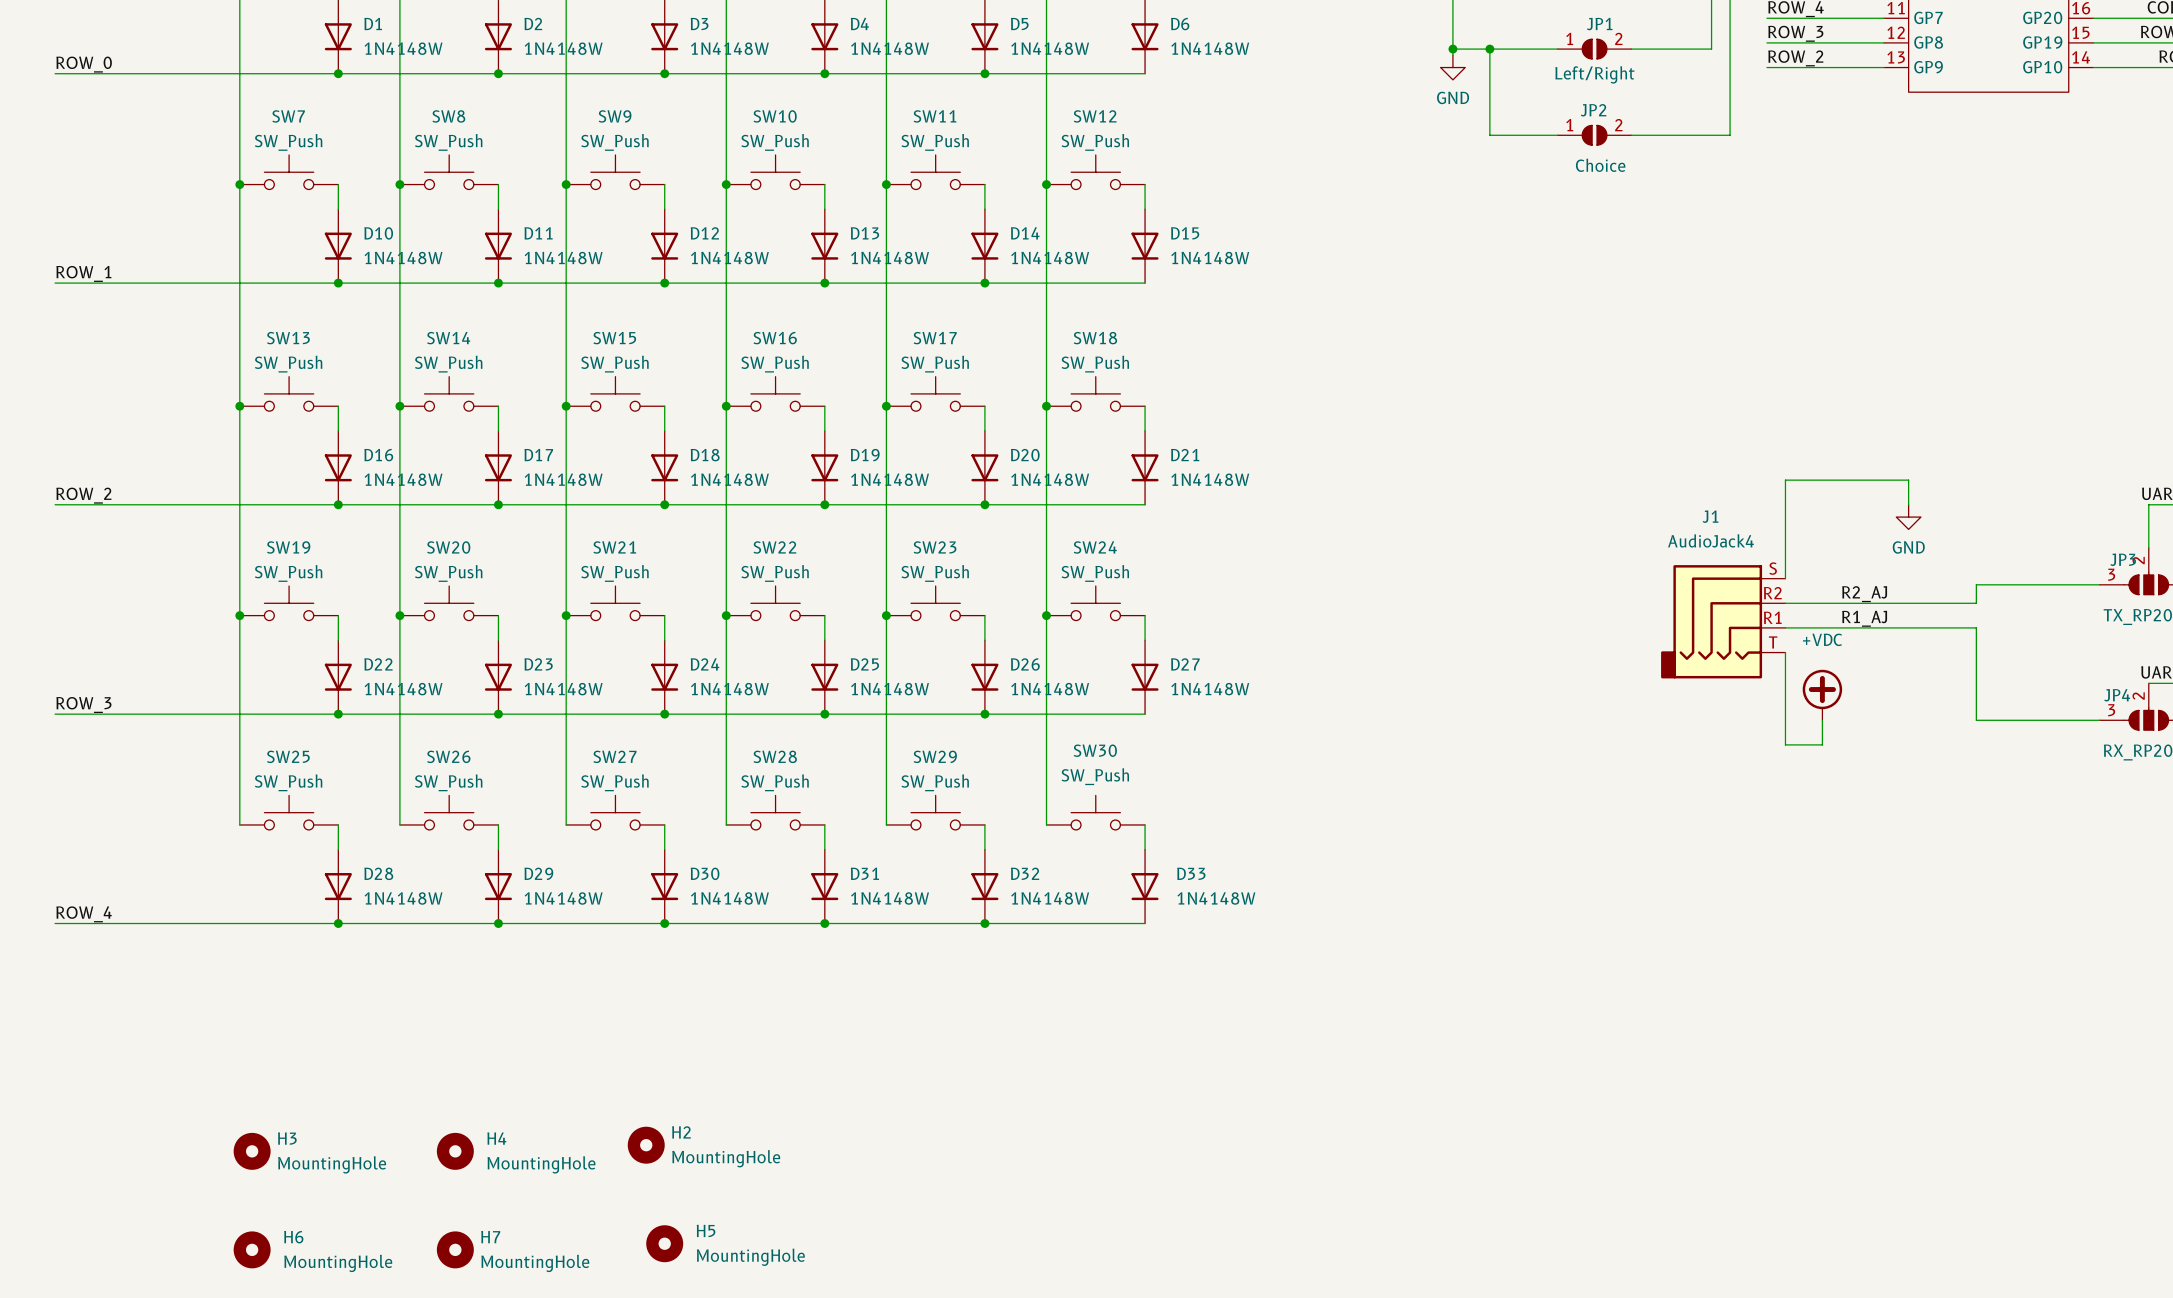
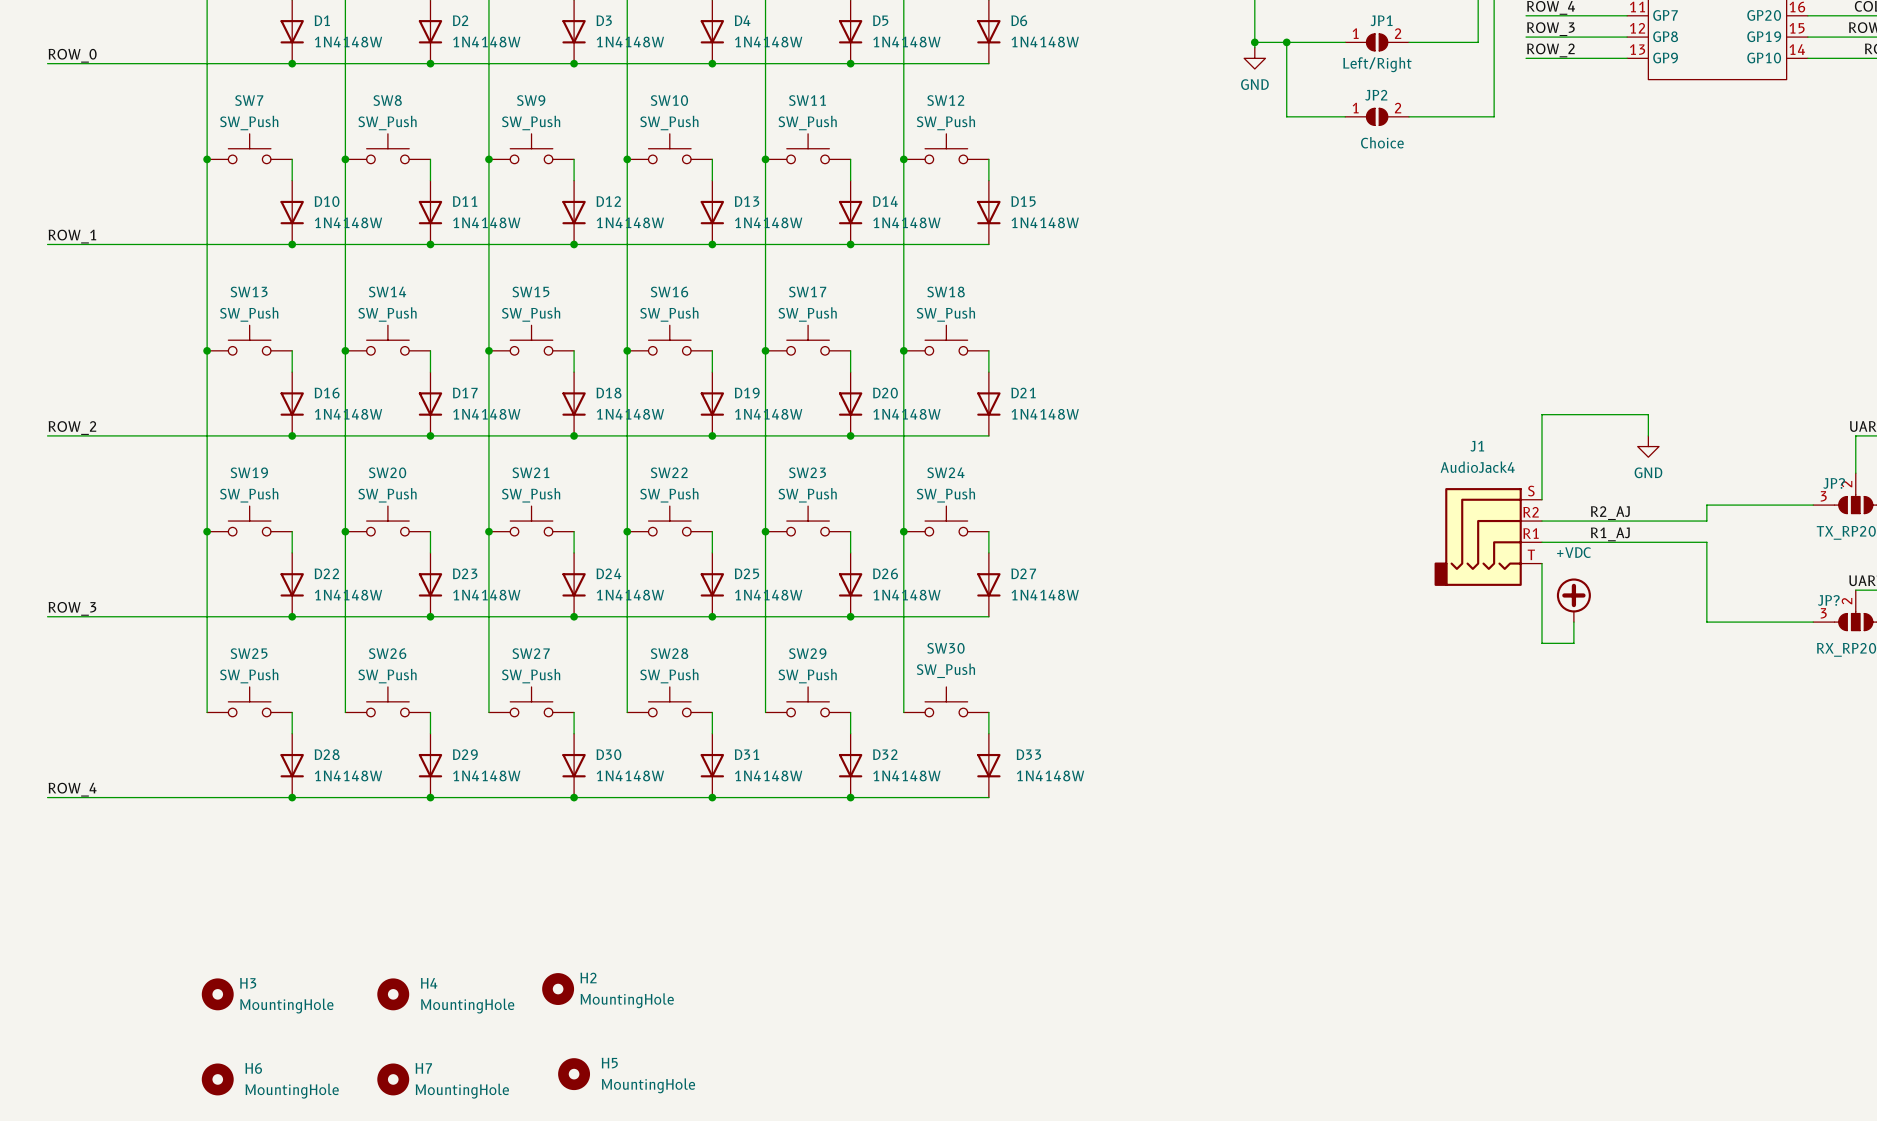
JP3 name: JP3 (2123, 559) -> JP? (1834, 483)
JP4 name: JP4 (2117, 695) -> JP? (1828, 600)

